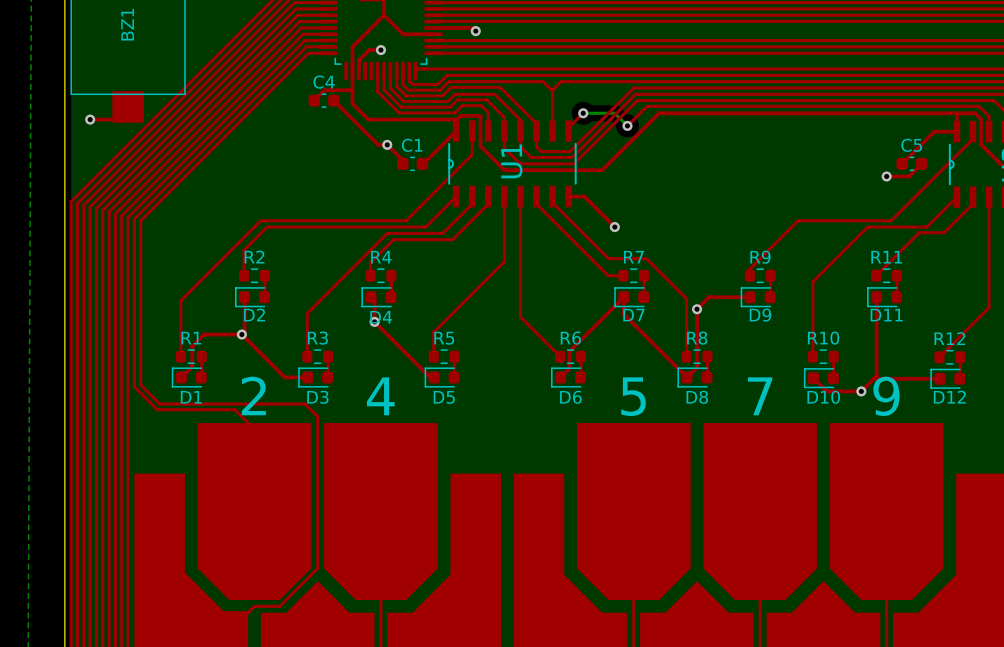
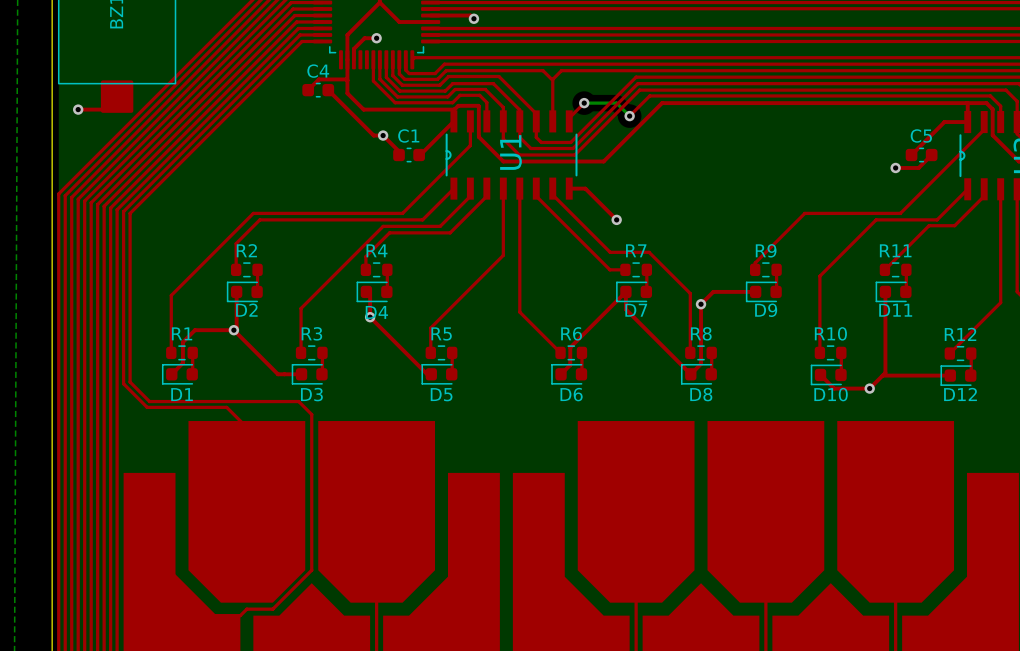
text: 2 (253, 395) -> none
text: 4 (380, 396) -> none
text: 5 (633, 396) -> none
text: 7 (760, 396) -> none
text: 9 (886, 396) -> none

